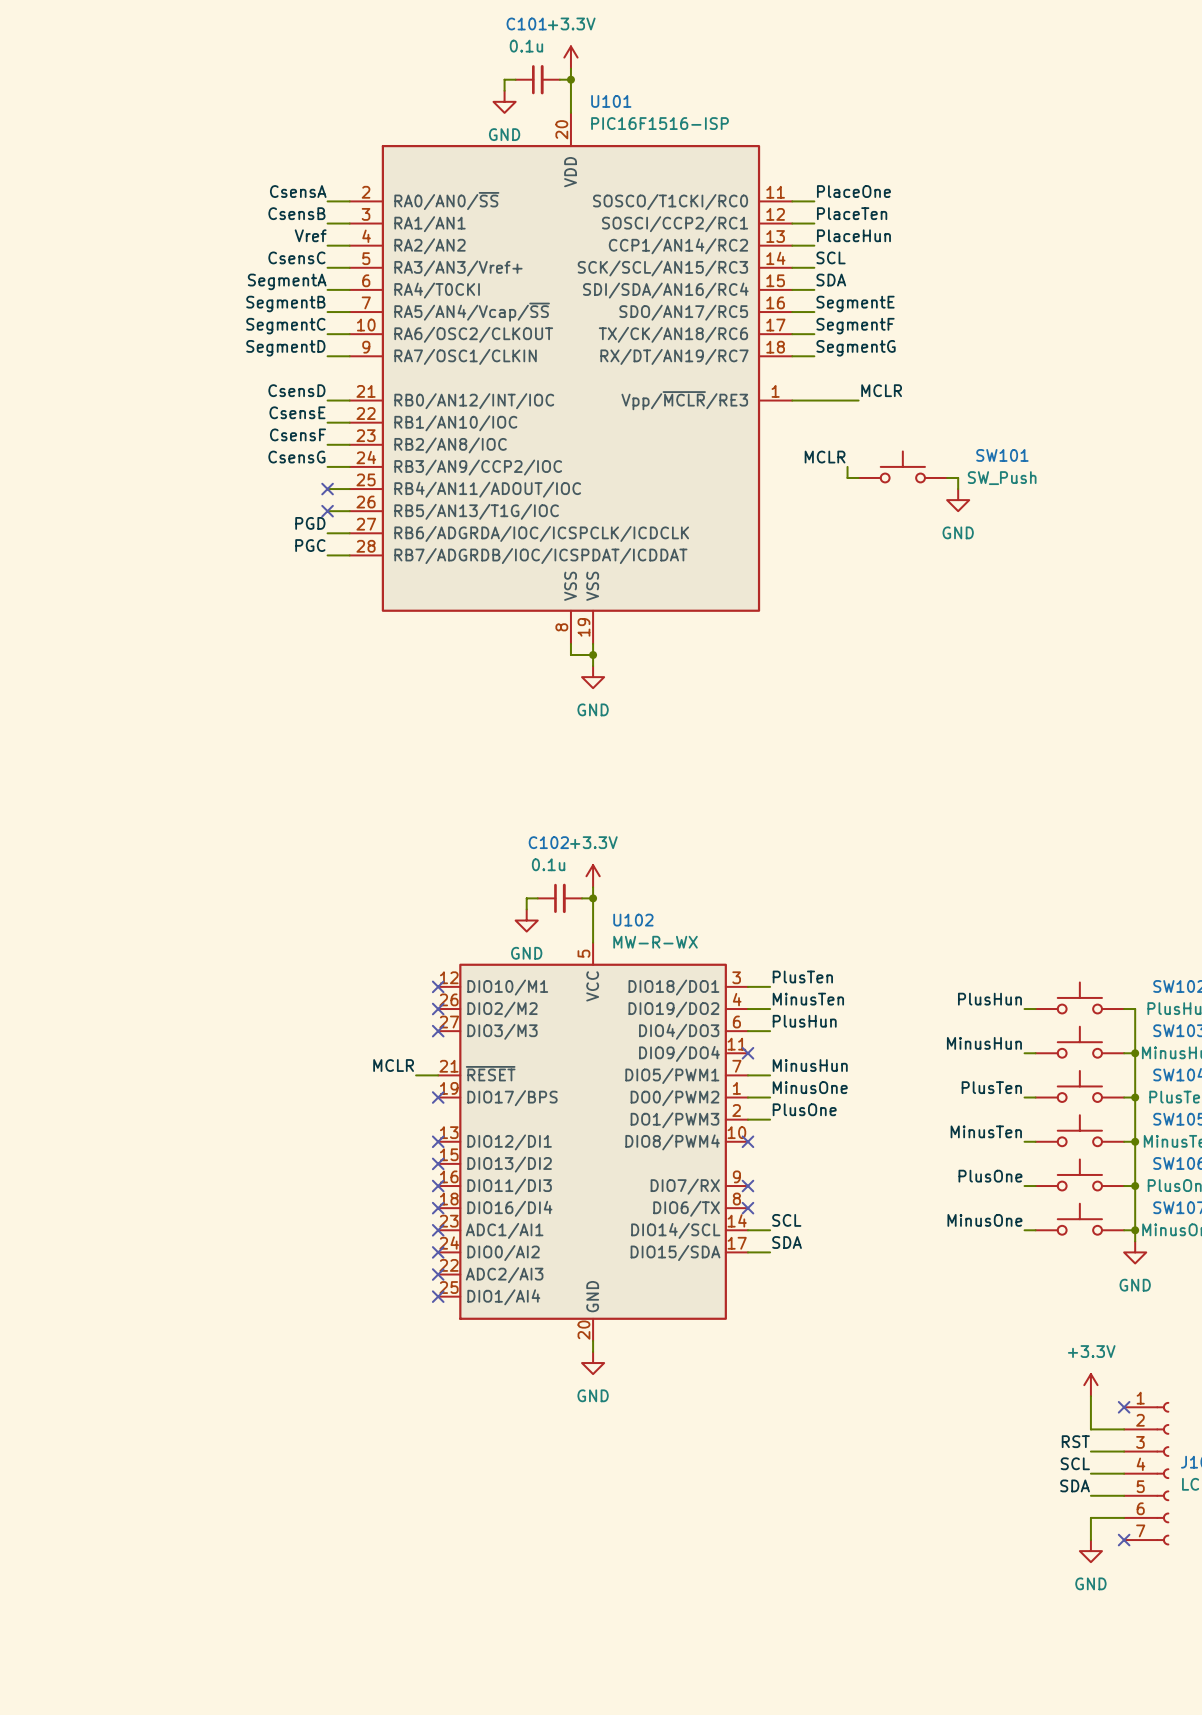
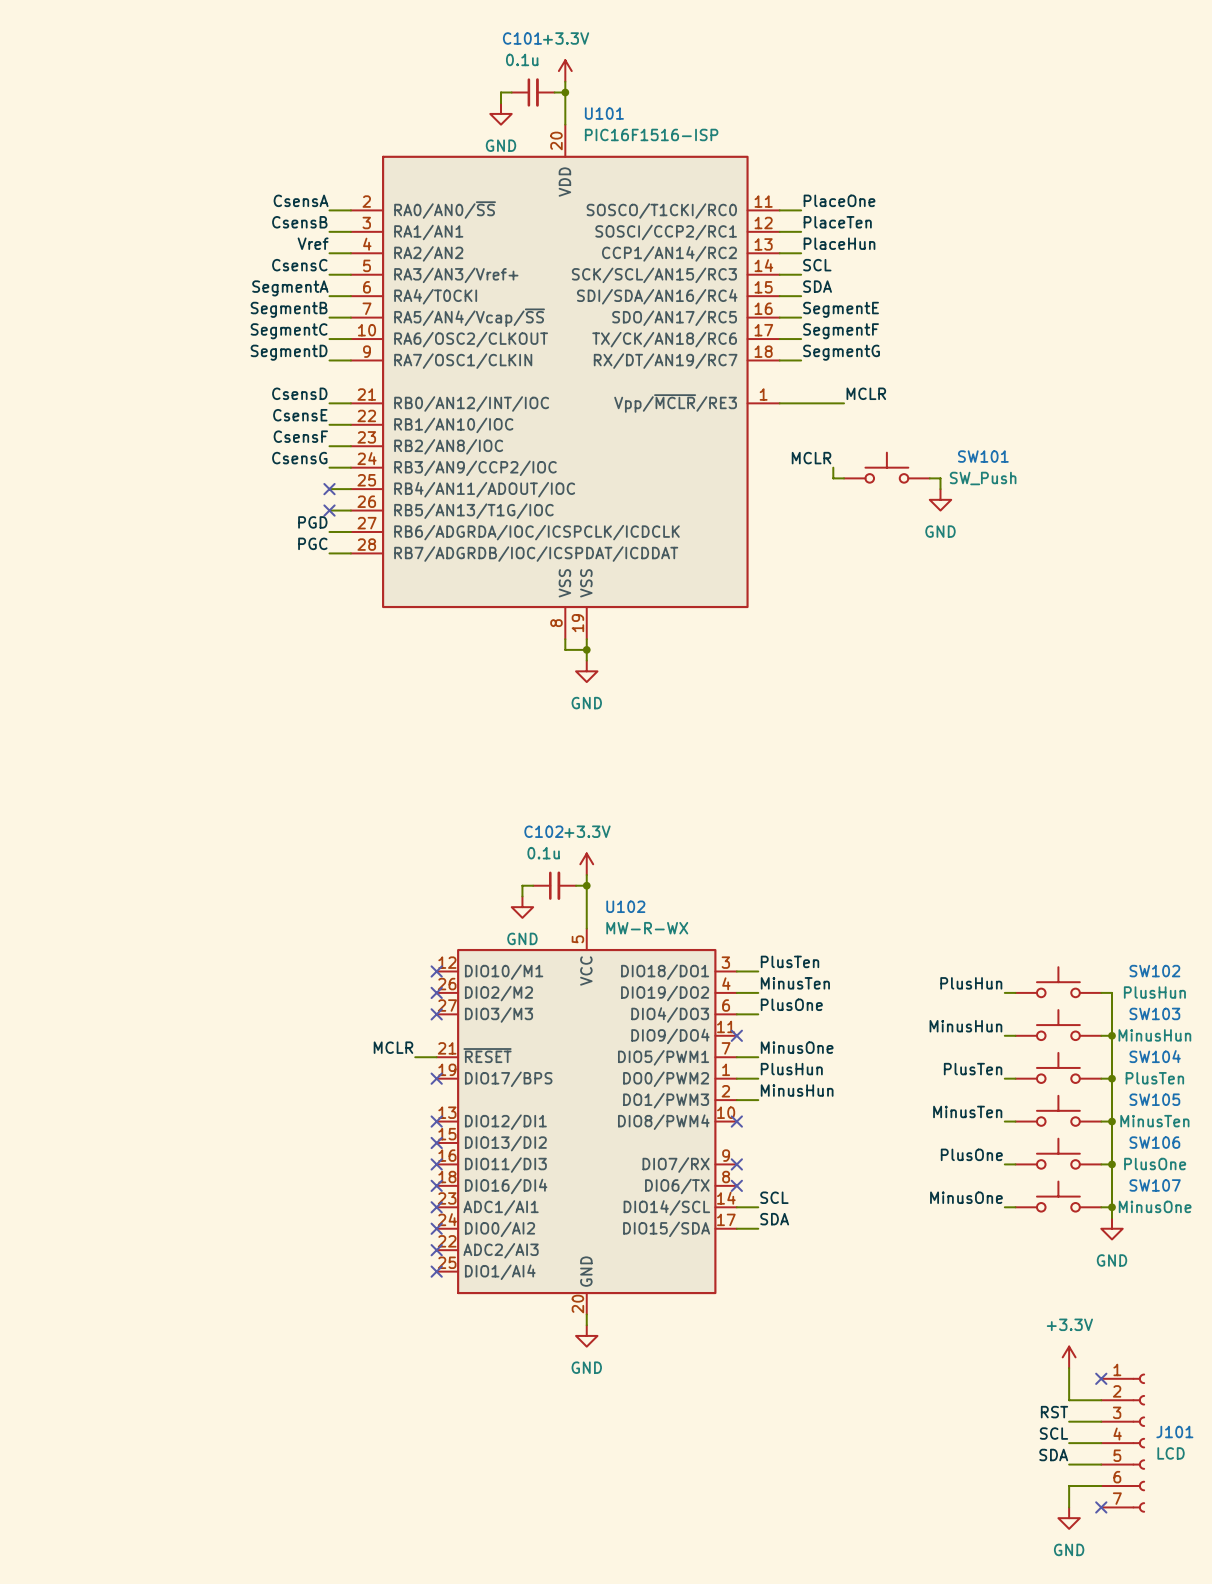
label: PlusHun (804, 1021) -> PlusOne (791, 1004)
label: MinusHun (810, 1065) -> MinusOne (797, 1047)
label: MinusOne (810, 1087) -> PlusHun (791, 1069)
label: PlusOne (804, 1109) -> MinusHun (797, 1090)

